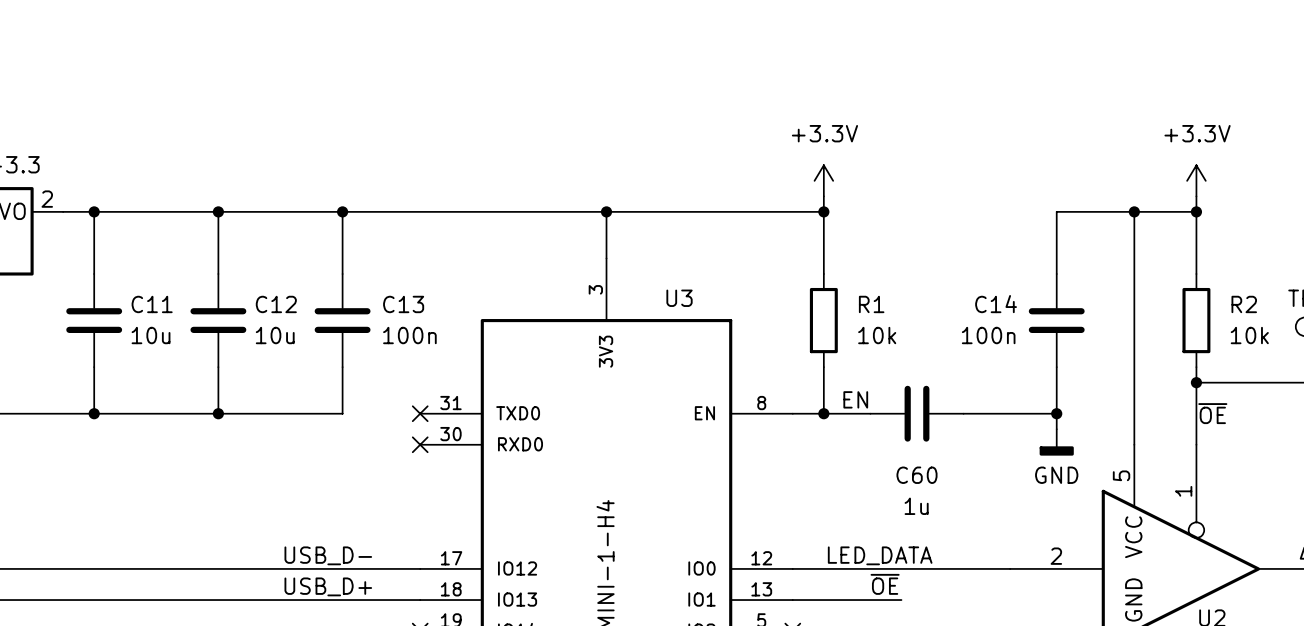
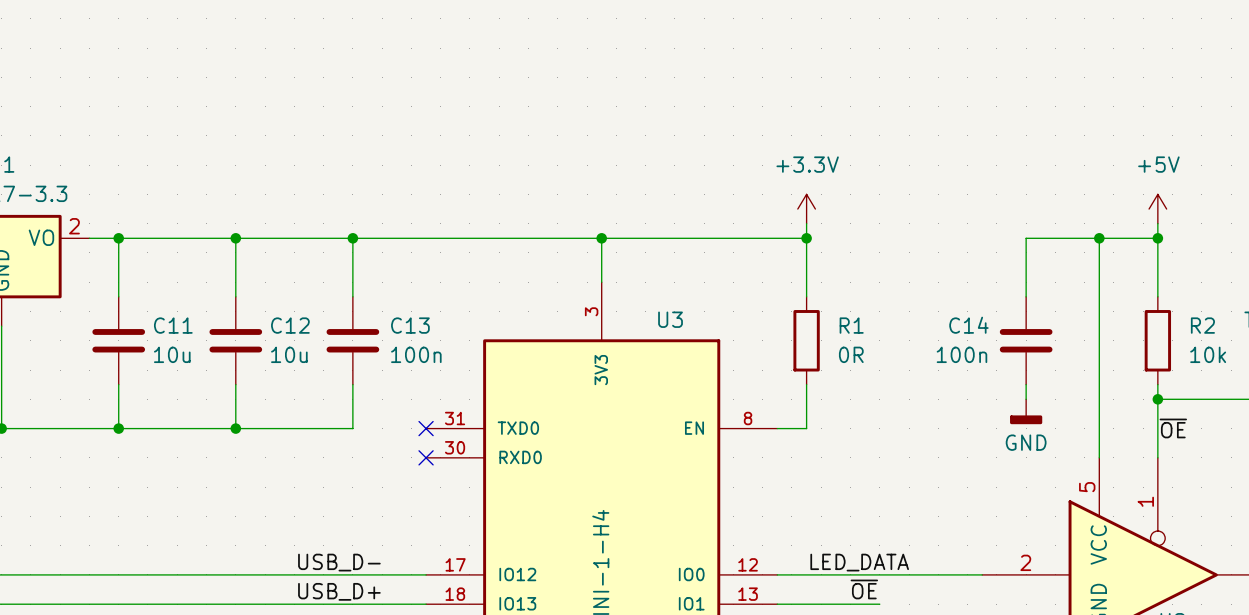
power symbol: +3.3V (1196, 180) -> +5V (1157, 209)
R1 value: 10k (877, 335) -> 0R (851, 354)
label: EN (855, 399) -> none
wire: (823, 413) (870, 413) -> none
junction: (823, 413) -> none
C60: 1u (917, 413) -> none
wire: (963, 413) (1056, 413) -> none
junction: (1056, 413) -> none
power symbol position: GND (1056, 442) -> GND (1026, 411)

